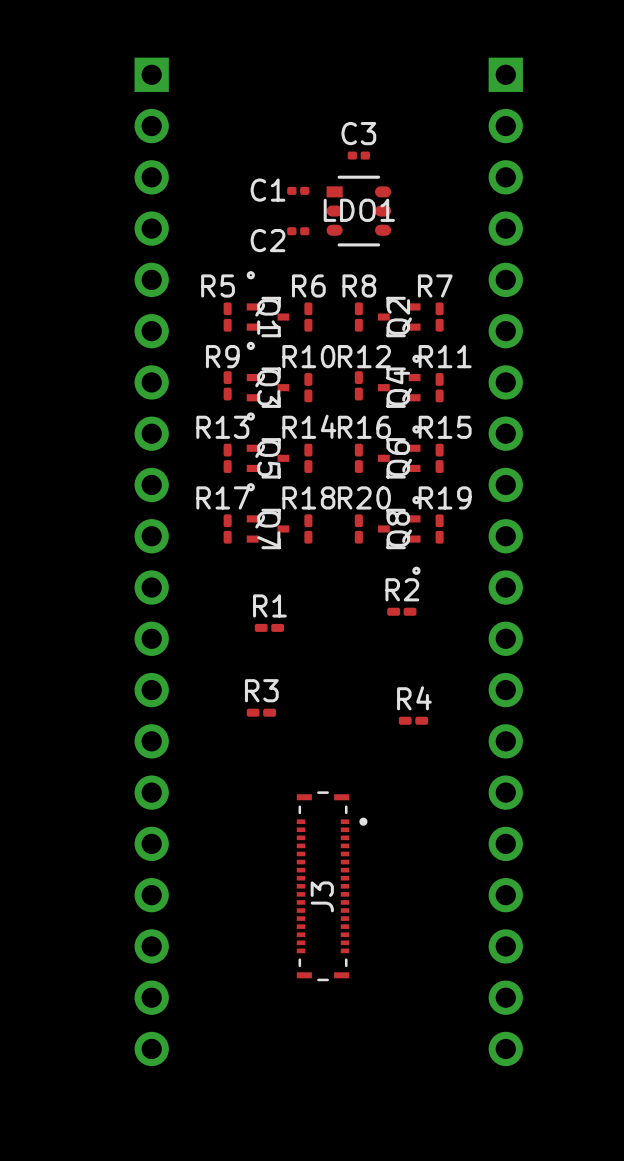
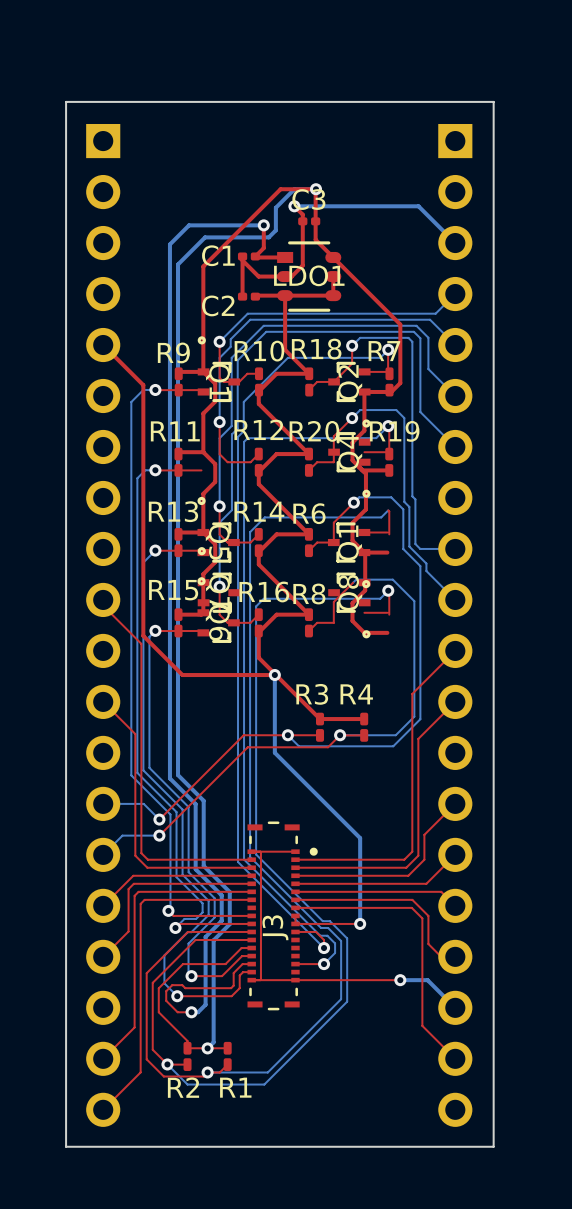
board edge: none -> (66, 101) (493, 101) (493, 1146) (66, 1146) (66, 101)
bottom track: none -> (316, 189) (294, 189) (275, 207) (275, 230) (268, 237) (205, 237) (178, 264) (178, 775) (203, 800) (203, 865) (229, 892) (229, 924) (213, 940) (213, 1042) (207, 1048)
via: none -> (316, 189)
top track: none -> (294, 206) (302, 214) (302, 265) (291, 276) (258, 276) (242, 260)
bottom track: none -> (294, 206) (418, 206) (455, 243)
via: none -> (294, 206)
top track: none -> (263, 225) (263, 248) (255, 256)
bottom track: none -> (263, 225) (189, 225) (169, 244) (169, 778) (195, 804) (195, 869) (221, 895) (221, 920) (205, 936) (205, 1004) (198, 1012) (191, 1012)
via: none -> (263, 225)
top track: none -> (242, 256) (242, 296)
top track: none -> (256, 257) (285, 257)
top track: none -> (333, 276) (333, 295) (256, 295)
bottom track: none -> (455, 294) (435, 313) (247, 313) (219, 341)
top track: none -> (285, 295) (285, 349) (308, 373) (276, 373) (260, 390)
top track: none -> (219, 341) (219, 377) (223, 381) (239, 381) (247, 373) (258, 373)
via: none -> (219, 341)
top track: none -> (103, 345) (143, 385) (143, 635) (182, 675) (274, 675)
bottom track: none -> (455, 345) (430, 319) (250, 319) (230, 339) (230, 346) (219, 357) (219, 422)
top track: none -> (352, 345) (352, 363) (333, 381) (317, 381) (308, 390)
bottom track: none -> (352, 345) (360, 337) (408, 337) (412, 341) (412, 496) (415, 499) (415, 544) (420, 548) (455, 548)
via: none -> (352, 345)
top track: none -> (388, 349) (388, 372)
bottom track: none -> (388, 349) (380, 357) (287, 357) (243, 401) (243, 431) (237, 436) (237, 861) (324, 948)
via: none -> (388, 349)
R5 name: R5 (218, 285) -> R9 (173, 352)
R6 name: R6 (308, 285) -> R10 (259, 351)
R8 name: R8 (359, 285) -> R18 (316, 349)
top track: none -> (180, 371) (203, 371)
top track: none -> (203, 371) (215, 383) (215, 401) (203, 413) (203, 452)
top track: none -> (203, 371) (203, 266) (280, 189) (316, 189) (315, 239) (400, 324) (400, 383) (391, 391) (364, 391) (364, 430) (352, 442) (352, 460) (365, 473) (365, 509) (352, 522) (352, 540) (364, 552) (387, 552)
top track: none -> (364, 371) (387, 371)
top track: none -> (155, 390) (178, 390)
bottom track: none -> (155, 389) (143, 389) (131, 402) (131, 775) (170, 814) (170, 908) (168, 910)
via: none -> (155, 389)
top track: none -> (180, 390) (203, 390)
top track: none -> (258, 390) (258, 403) (308, 454) (276, 454) (260, 470)
bottom track: none -> (455, 395) (428, 369) (428, 337) (416, 325) (263, 325) (231, 357) (231, 426) (219, 438) (219, 506)
top track: none -> (352, 418) (333, 436) (333, 462) (317, 462) (308, 470)
bottom track: none -> (352, 418) (360, 410) (396, 410) (404, 418) (404, 501) (409, 506) (409, 546) (426, 563) (426, 571) (455, 599)
via: none -> (352, 418)
R12 name position: R12 (364, 356) -> R12 (258, 429)
R11 name position: R11 (445, 356) -> R11 (175, 431)
top track: none -> (219, 422) (219, 454) (227, 462) (250, 462) (258, 454)
via: none -> (219, 422)
top track: none -> (388, 426) (389, 454)
bottom track: none -> (388, 426) (376, 438) (247, 438) (244, 441) (244, 859) (320, 935) (327, 935) (335, 943) (335, 953) (324, 964)
via: none -> (388, 426)
Q3: (268, 374) -> none
bottom track: none -> (455, 446) (420, 412) (420, 338) (413, 331) (266, 331) (237, 360) (237, 428) (231, 434) (231, 510) (219, 522) (219, 586)
R9: (227, 385) -> none
R12 position: (358, 385) -> (258, 462)
top track: none -> (180, 452) (203, 452)
top track: none -> (203, 452) (215, 464) (215, 481) (203, 493) (203, 532)
R10: (308, 387) -> none
top track: none -> (364, 452) (387, 452)
R11 position: (439, 387) -> (178, 462)
bottom track: none -> (155, 470) (145, 470) (137, 478) (137, 772) (176, 812) (176, 877) (202, 903) (202, 912) (196, 918) (184, 918) (175, 927)
via: none -> (155, 470)
top track: none -> (155, 470) (201, 470)
top track: none -> (258, 470) (258, 484) (308, 534) (276, 534) (260, 550)
top track: none -> (362, 470) (389, 470)
R15 name position: R15 (445, 427) -> R15 (173, 590)
top track: none -> (353, 502) (333, 522) (333, 542) (317, 542) (308, 550)
bottom track: none -> (353, 502) (359, 497) (391, 497) (403, 509) (403, 549) (420, 566) (420, 719) (393, 746) (298, 746) (287, 735)
via: none -> (353, 502)
top track: none -> (219, 506) (219, 534) (227, 542) (250, 542) (258, 534)
via: none -> (219, 506)
Q5 position: (268, 445) -> (218, 529)
top track: none -> (388, 510) (389, 534)
bottom track: none -> (388, 510) (381, 517) (264, 517) (250, 532) (250, 856) (321, 927) (328, 927) (341, 940) (341, 999) (267, 1072) (207, 1072)
R13 position: (227, 458) -> (178, 542)
R14 position: (308, 458) -> (258, 542)
R16 position: (358, 458) -> (258, 622)
R15 position: (439, 458) -> (178, 622)
top track: none -> (180, 532) (203, 532)
top track: none -> (203, 532) (215, 544) (215, 562) (203, 574) (203, 612) (201, 614) (178, 614)
top track: none -> (364, 532) (387, 532)
Q6 rotation: 0° (399, 471) -> 180° (218, 610)
Q6 position: (399, 471) -> (218, 610)
R6: none -> (308, 542)
bottom track: none -> (155, 550) (143, 562) (143, 770) (182, 809) (182, 874) (208, 900) (208, 914) (164, 955) (164, 983) (177, 996)
via: none -> (155, 550)
top track: none -> (159, 550) (201, 550)
top track: none -> (258, 550) (258, 564) (308, 614) (276, 614) (260, 631)
top track: none -> (365, 553) (365, 590) (352, 603) (352, 620) (364, 632) (387, 632)
Q1: none -> (349, 555)
top track: none -> (353, 582) (333, 601) (333, 622) (317, 622) (308, 631)
bottom track: none -> (353, 582) (356, 579) (392, 579) (414, 601) (414, 716) (395, 735) (340, 735)
top track: none -> (219, 586) (219, 614) (227, 622) (250, 622) (258, 614)
via: none -> (219, 586)
top track: none -> (388, 590) (389, 614)
bottom track: none -> (388, 590) (380, 598) (263, 598) (256, 606) (256, 854) (322, 921) (329, 921) (347, 938) (347, 1001) (264, 1084) (187, 1084) (167, 1064)
via: none -> (388, 590)
R17: (227, 528) -> none
R18: (308, 528) -> none
R20 position: (358, 528) -> (308, 462)
R19 position: (439, 528) -> (389, 462)
top track: none -> (103, 605) (141, 643) (141, 853) (147, 859) (251, 859)
top track: none -> (364, 612) (387, 612)
R8: none -> (308, 622)
top track: none -> (155, 631) (201, 631)
bottom track: none -> (155, 630) (149, 636) (149, 767) (188, 807) (188, 872) (214, 898) (214, 917) (188, 943) (188, 973) (191, 976)
via: none -> (155, 630)
top track: none -> (258, 631) (258, 657) (320, 719) (364, 719)
top track: none -> (455, 650) (412, 693) (412, 851) (404, 859) (295, 859)
R2 name position: R2 (402, 589) -> R2 (183, 1087)
bottom track: none -> (274, 675) (274, 752) (360, 838) (360, 923)
via: none -> (274, 675)
R2 rotation: 0° (401, 611) -> 90° clockwise (187, 1056)
R2 position: (401, 611) -> (187, 1056)
R1 rotation: 0° (269, 627) -> 90° clockwise (227, 1056)
R1 position: (269, 627) -> (227, 1056)
top track: none -> (103, 701) (135, 734) (135, 855) (147, 867) (251, 867)
top track: none -> (455, 701) (418, 738) (418, 855) (406, 867) (295, 867)
via: none -> (287, 735)
top track: none -> (319, 735) (243, 735) (159, 819)
top track: none -> (340, 735) (328, 747) (247, 747) (159, 835)
via: none -> (340, 735)
top track: none -> (340, 735) (364, 735)
R3 rotation: 0° (261, 712) -> 90° clockwise (320, 727)
R3 position: (261, 712) -> (320, 727)
R4 rotation: 0° (413, 720) -> 90° clockwise (364, 727)
R4 position: (413, 720) -> (364, 727)
bottom track: none -> (103, 803) (143, 803) (159, 819)
top track: none -> (455, 803) (424, 834) (424, 859) (408, 875) (295, 875)
via: none -> (159, 819)
bottom track: none -> (159, 835) (122, 835) (103, 854)
via: none -> (159, 835)
top track: none -> (251, 851) (295, 851)
top track: none -> (260, 851) (260, 980)
top track: none -> (455, 854) (426, 883) (295, 883)
top track: none -> (251, 875) (133, 875) (103, 905)
top track: none -> (251, 883) (133, 883) (128, 889) (128, 931) (103, 956)
top track: none -> (251, 891) (138, 891) (134, 895) (134, 1027) (103, 1058)
top track: none -> (295, 891) (441, 891) (455, 905)
top track: none -> (251, 899) (144, 899) (140, 903) (140, 1072) (103, 1109)
top track: none -> (295, 899) (412, 899) (428, 915) (428, 944) (441, 956)
top track: none -> (295, 907) (411, 907) (422, 918) (422, 1025) (455, 1058)
top track: none -> (168, 910) (173, 915) (251, 915)
via: none -> (168, 910)
top track: none -> (295, 915) (295, 923) (360, 923)
top track: none -> (179, 923) (251, 923)
via: none -> (360, 923)
via: none -> (175, 927)
top track: none -> (251, 931) (187, 931) (146, 973) (146, 1059) (163, 1076) (203, 1076) (207, 1072) (219, 1072) (227, 1064)
top track: none -> (295, 931) (316, 931) (324, 940) (324, 948)
top track: none -> (251, 940) (195, 940) (152, 982) (152, 1049) (167, 1064) (171, 1064)
top track: none -> (251, 948) (241, 948) (225, 964) (182, 964) (158, 988) (158, 1012) (187, 1041) (187, 1048) (207, 1048)
J3 position: (332, 886) -> (282, 915)
via: none -> (324, 948)
top track: none -> (251, 956) (242, 956) (222, 976) (191, 976)
top track: none -> (251, 964) (242, 964) (233, 973) (233, 985) (231, 988) (185, 988) (182, 985) (172, 985) (166, 991) (166, 1000) (177, 1012) (191, 1012)
top track: none -> (295, 964) (324, 964)
via: none -> (324, 964)
top track: none -> (251, 972) (243, 972) (239, 975) (239, 988) (231, 996) (177, 996)
via: none -> (191, 976)
top track: none -> (251, 980) (400, 980)
bottom track: none -> (400, 980) (427, 980) (455, 1007)
via: none -> (400, 980)
via: none -> (177, 996)
via: none -> (191, 1012)
via: none -> (207, 1048)
top track: none -> (211, 1048) (227, 1048)
via: none -> (167, 1064)
top track: none -> (171, 1064) (187, 1064)
via: none -> (207, 1072)

